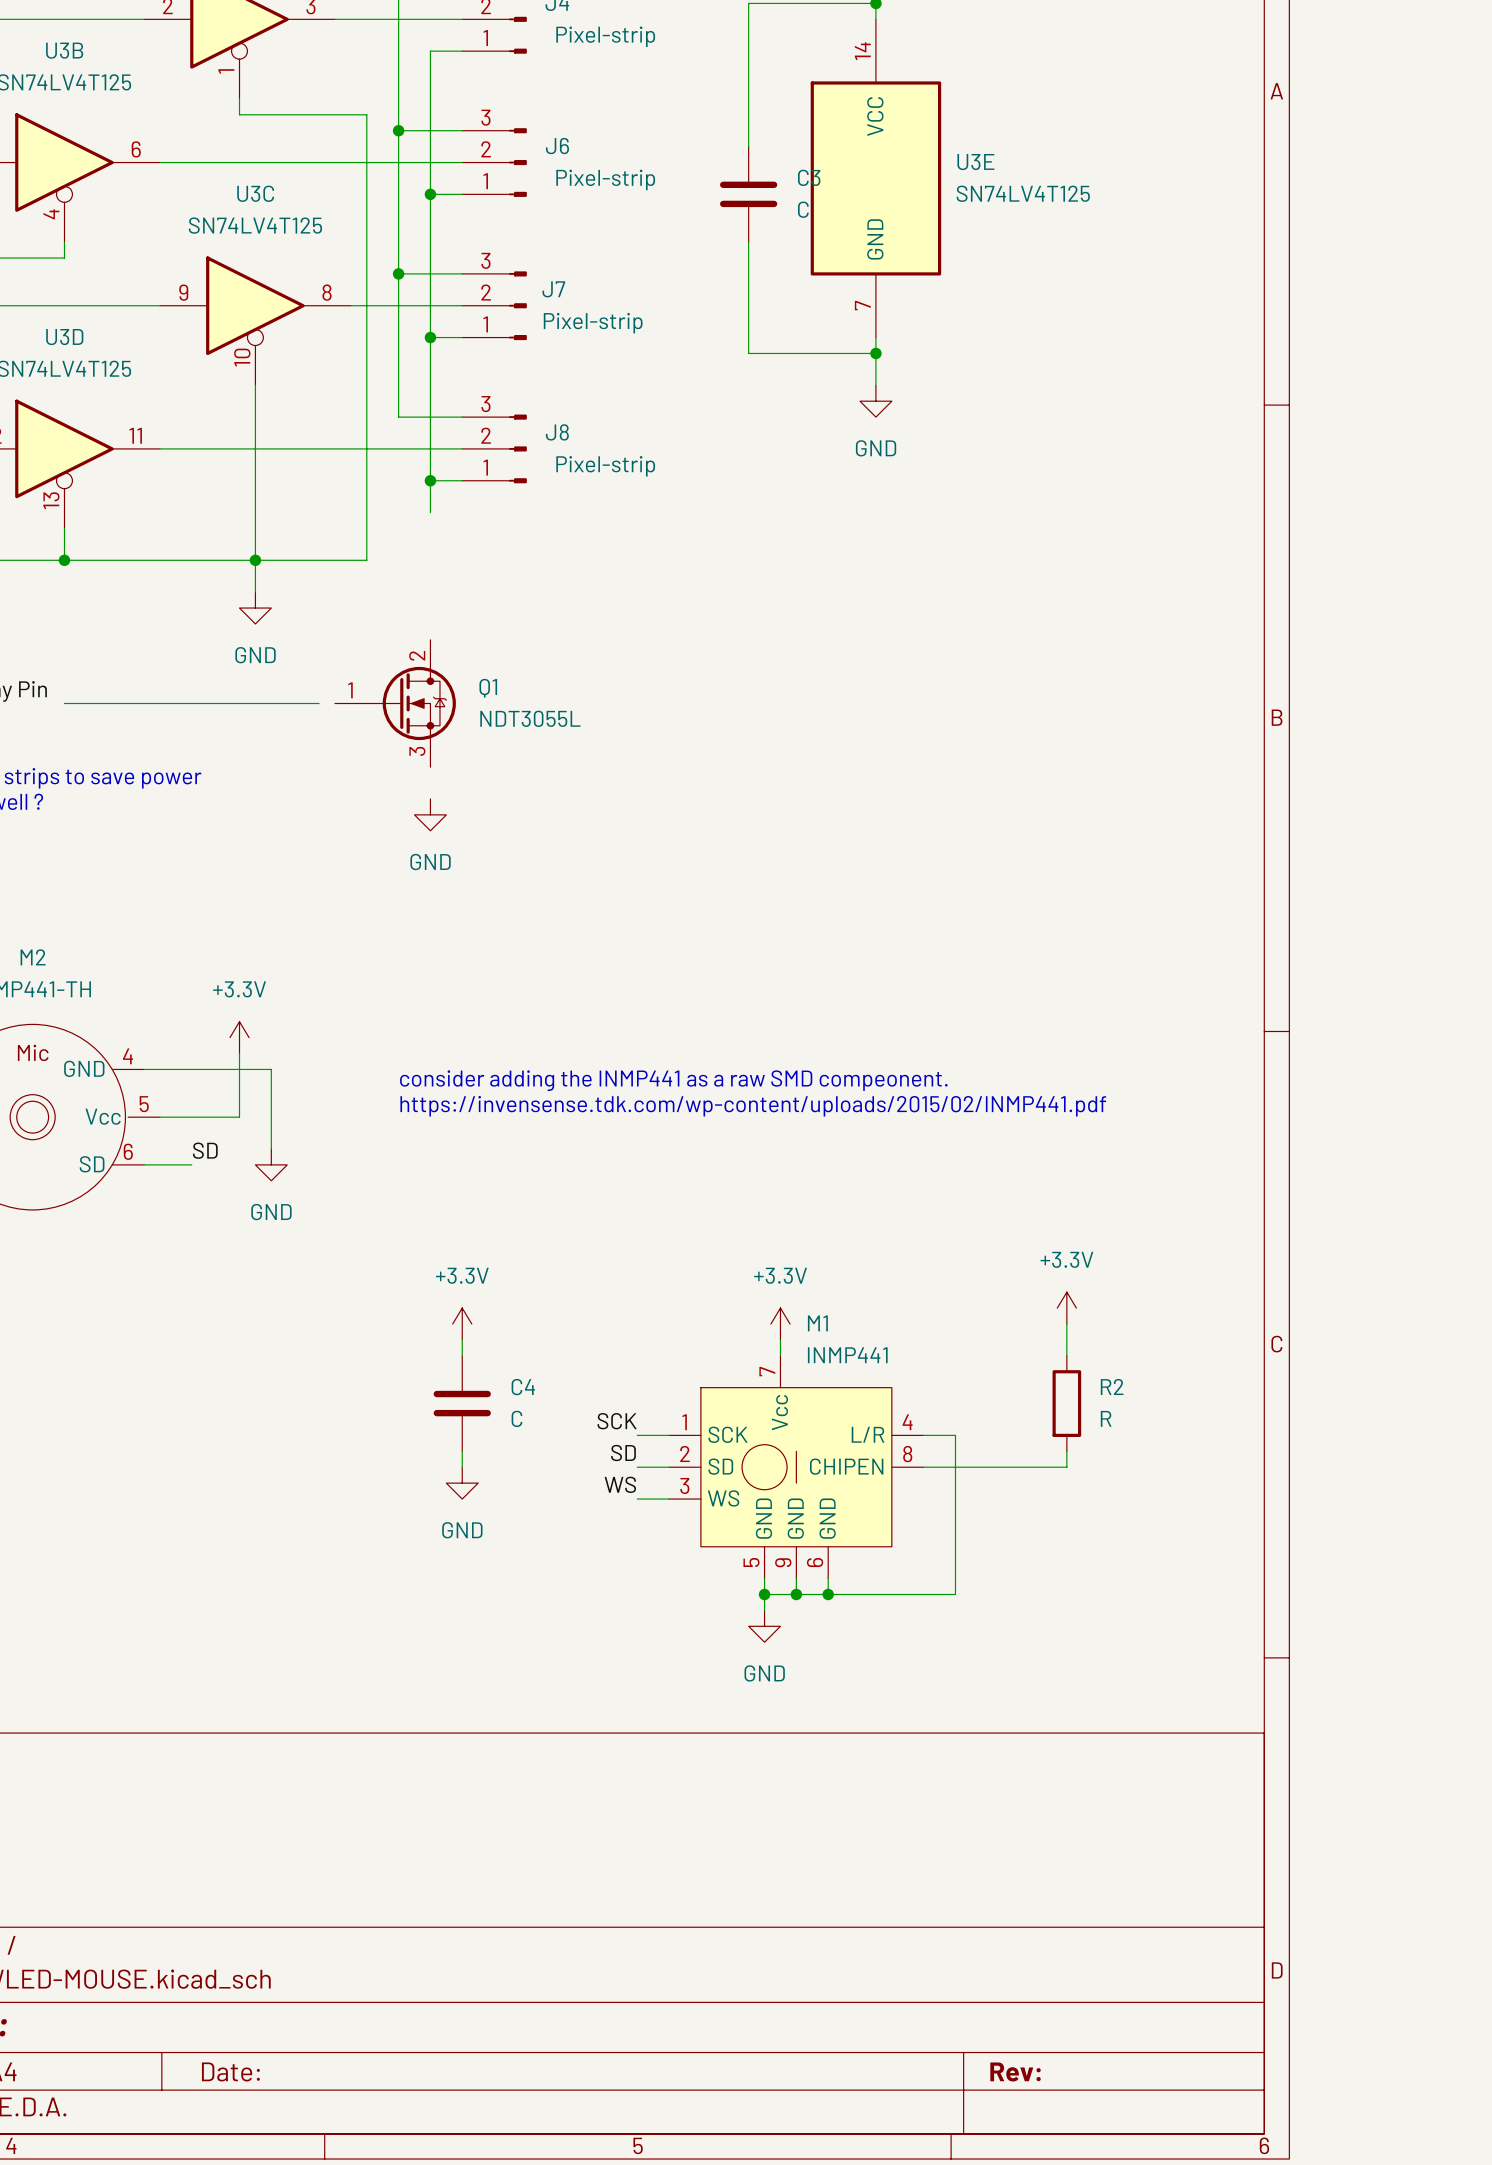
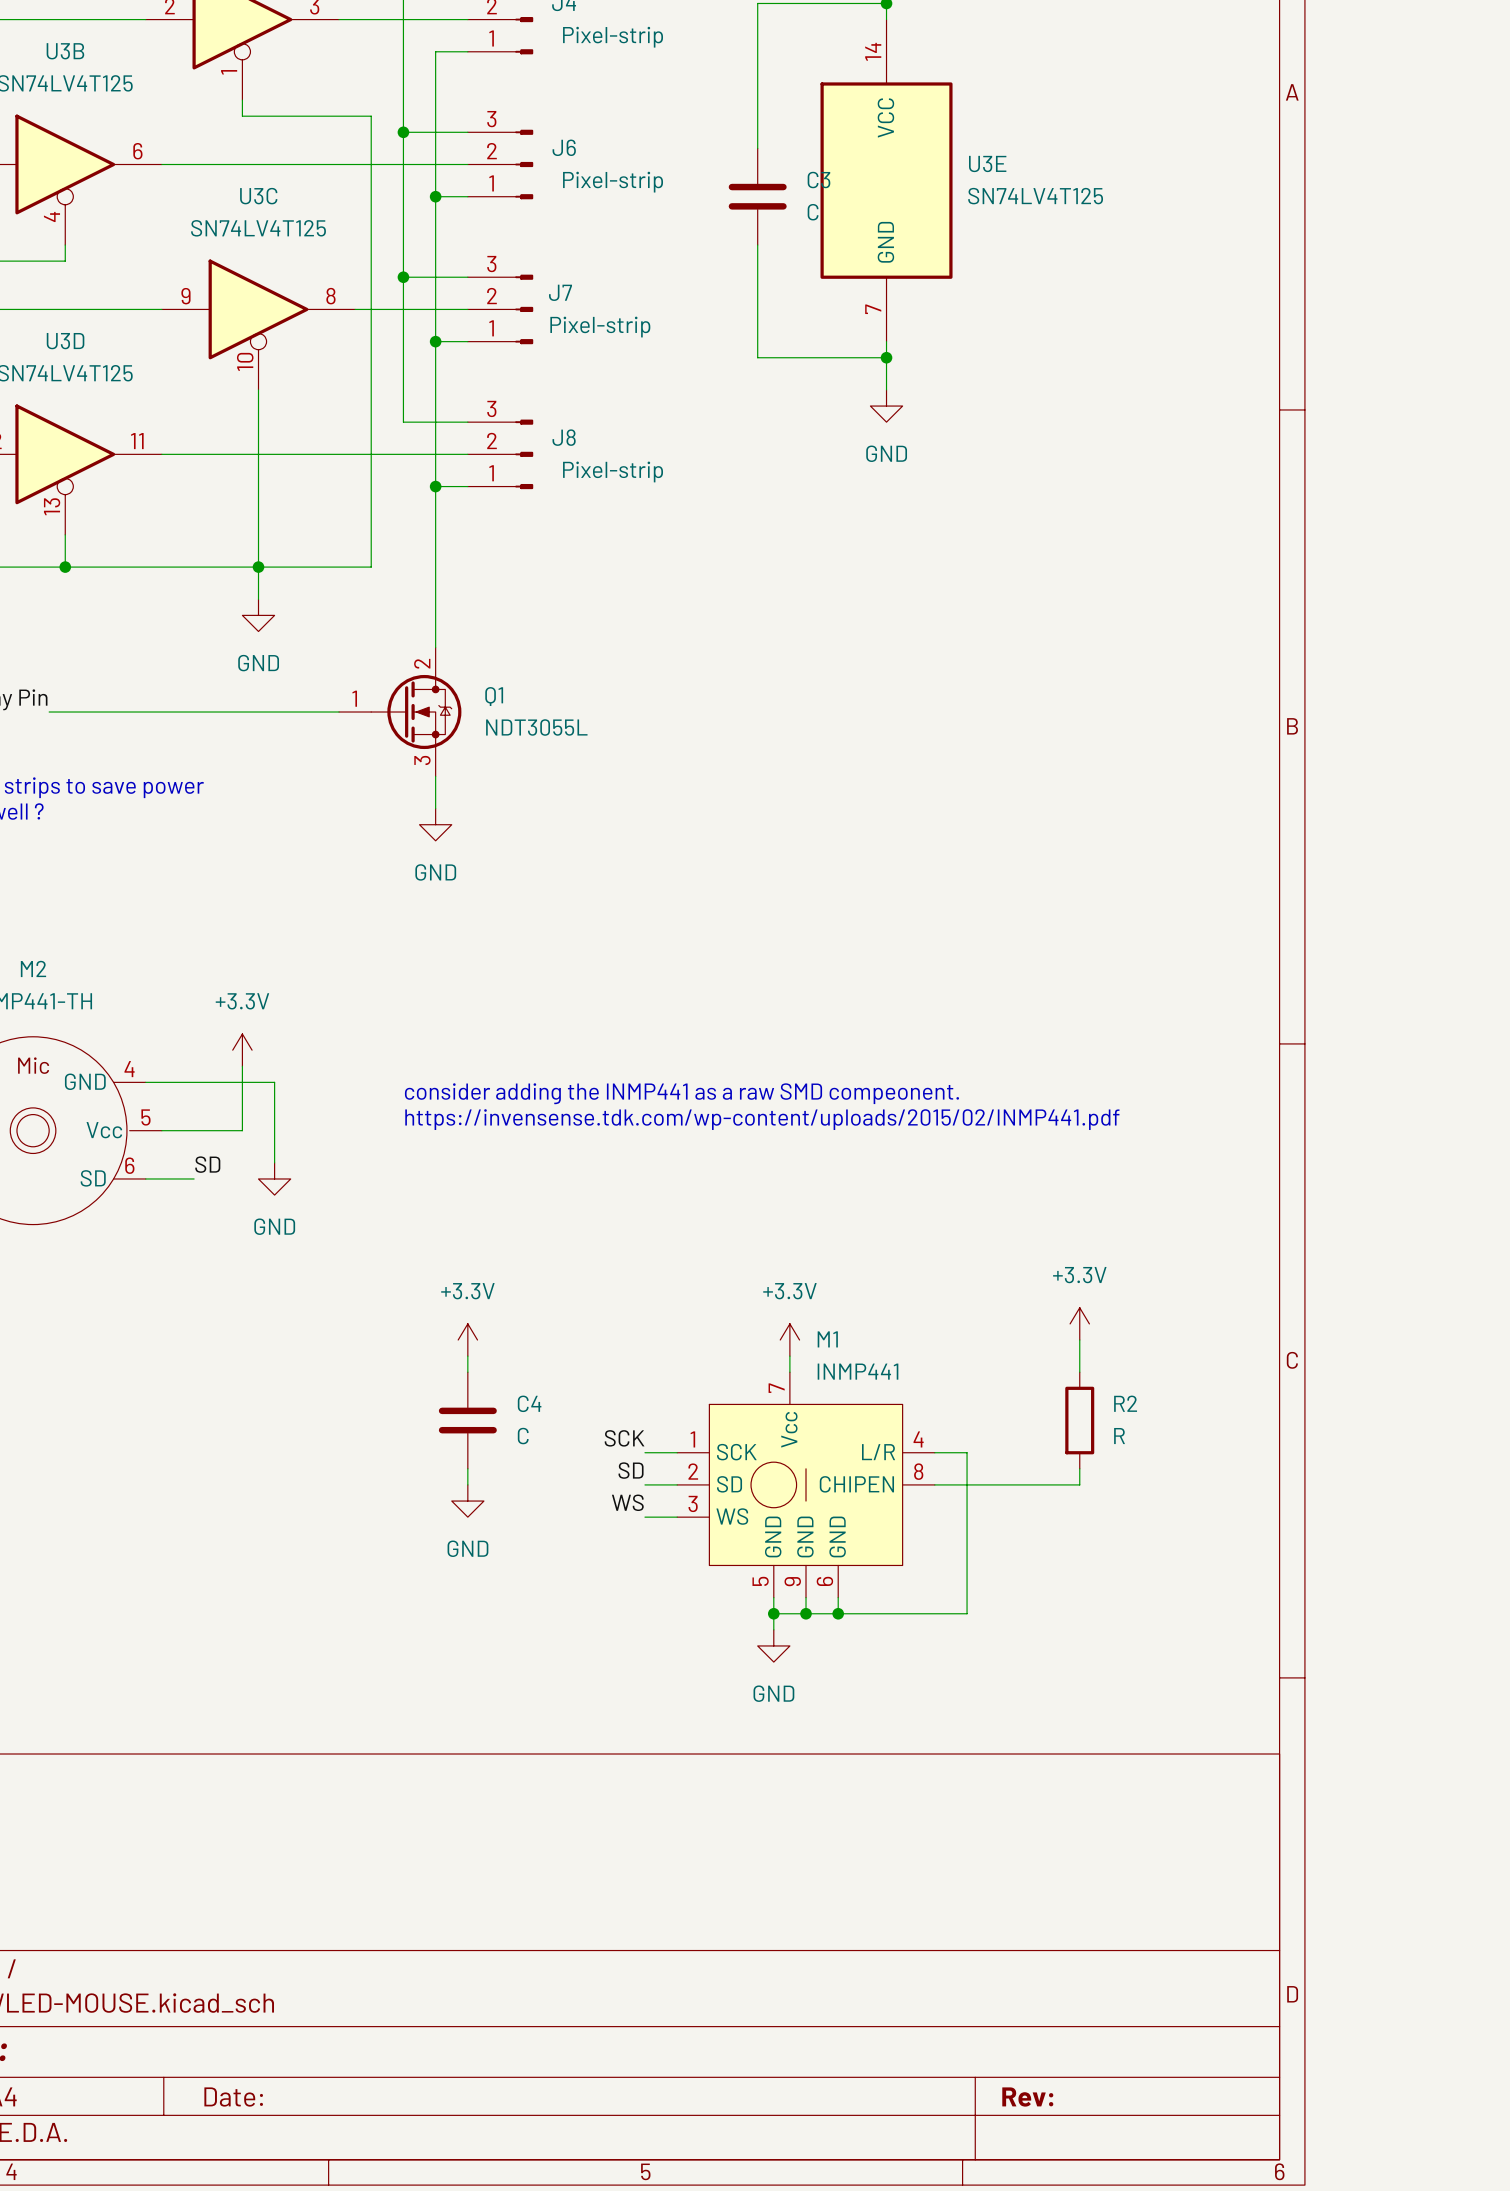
wire: none -> (435, 518) (435, 647)
wire: none -> (49, 712) (65, 712)
wire: none -> (322, 712) (339, 712)
wire: none -> (435, 776) (435, 808)

